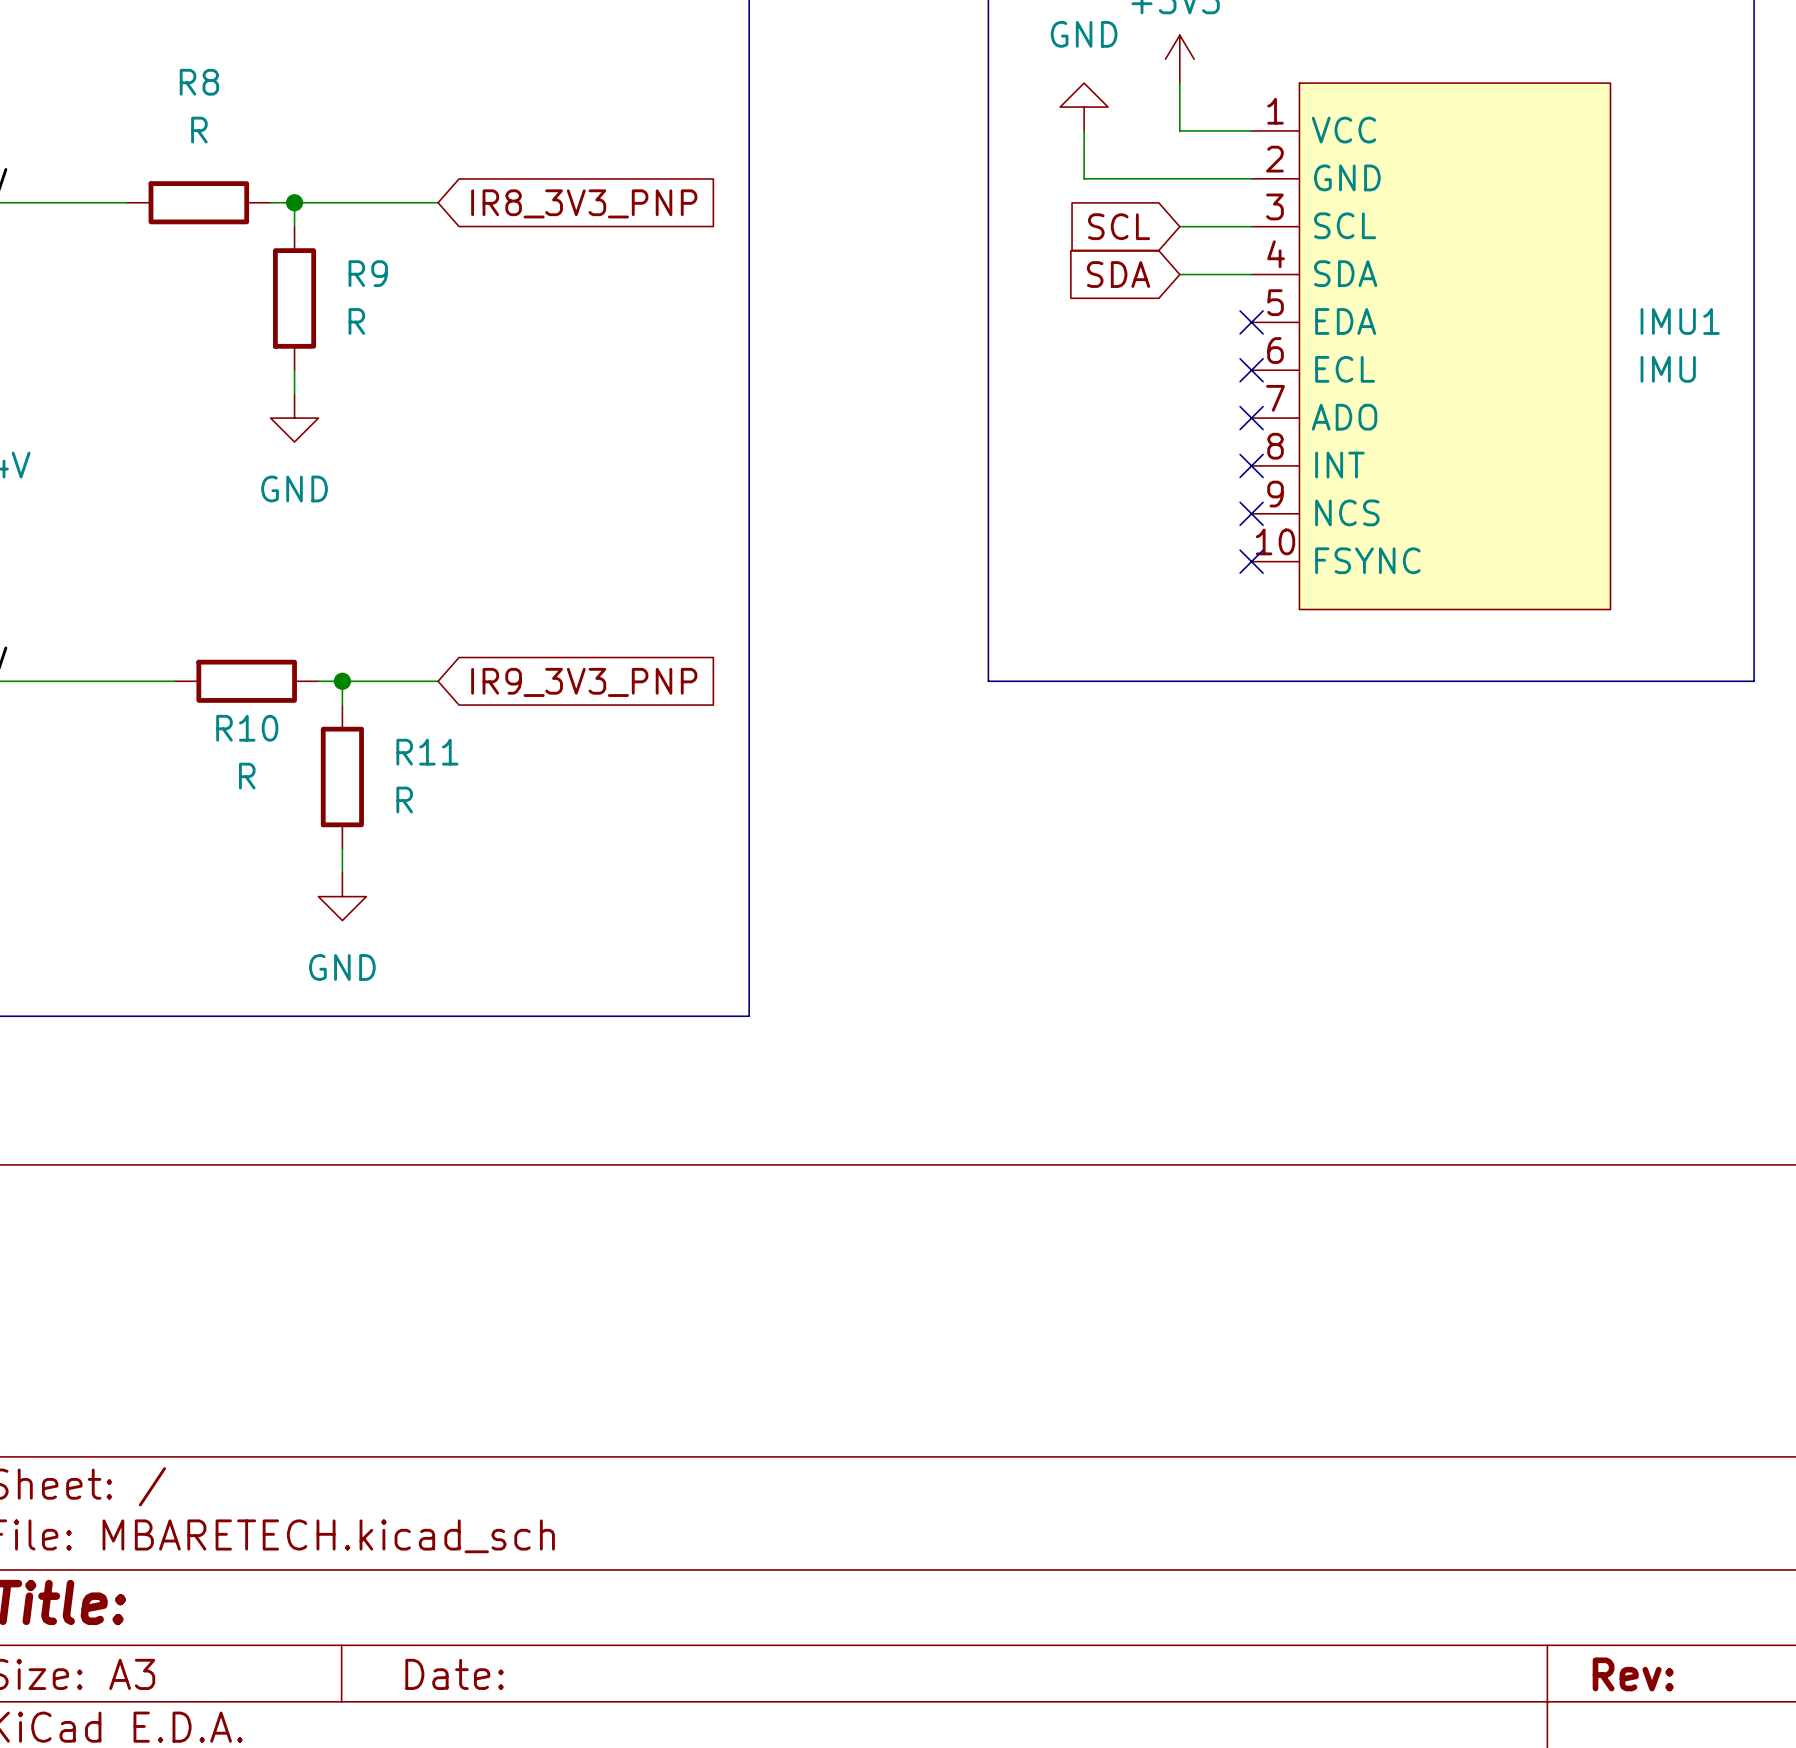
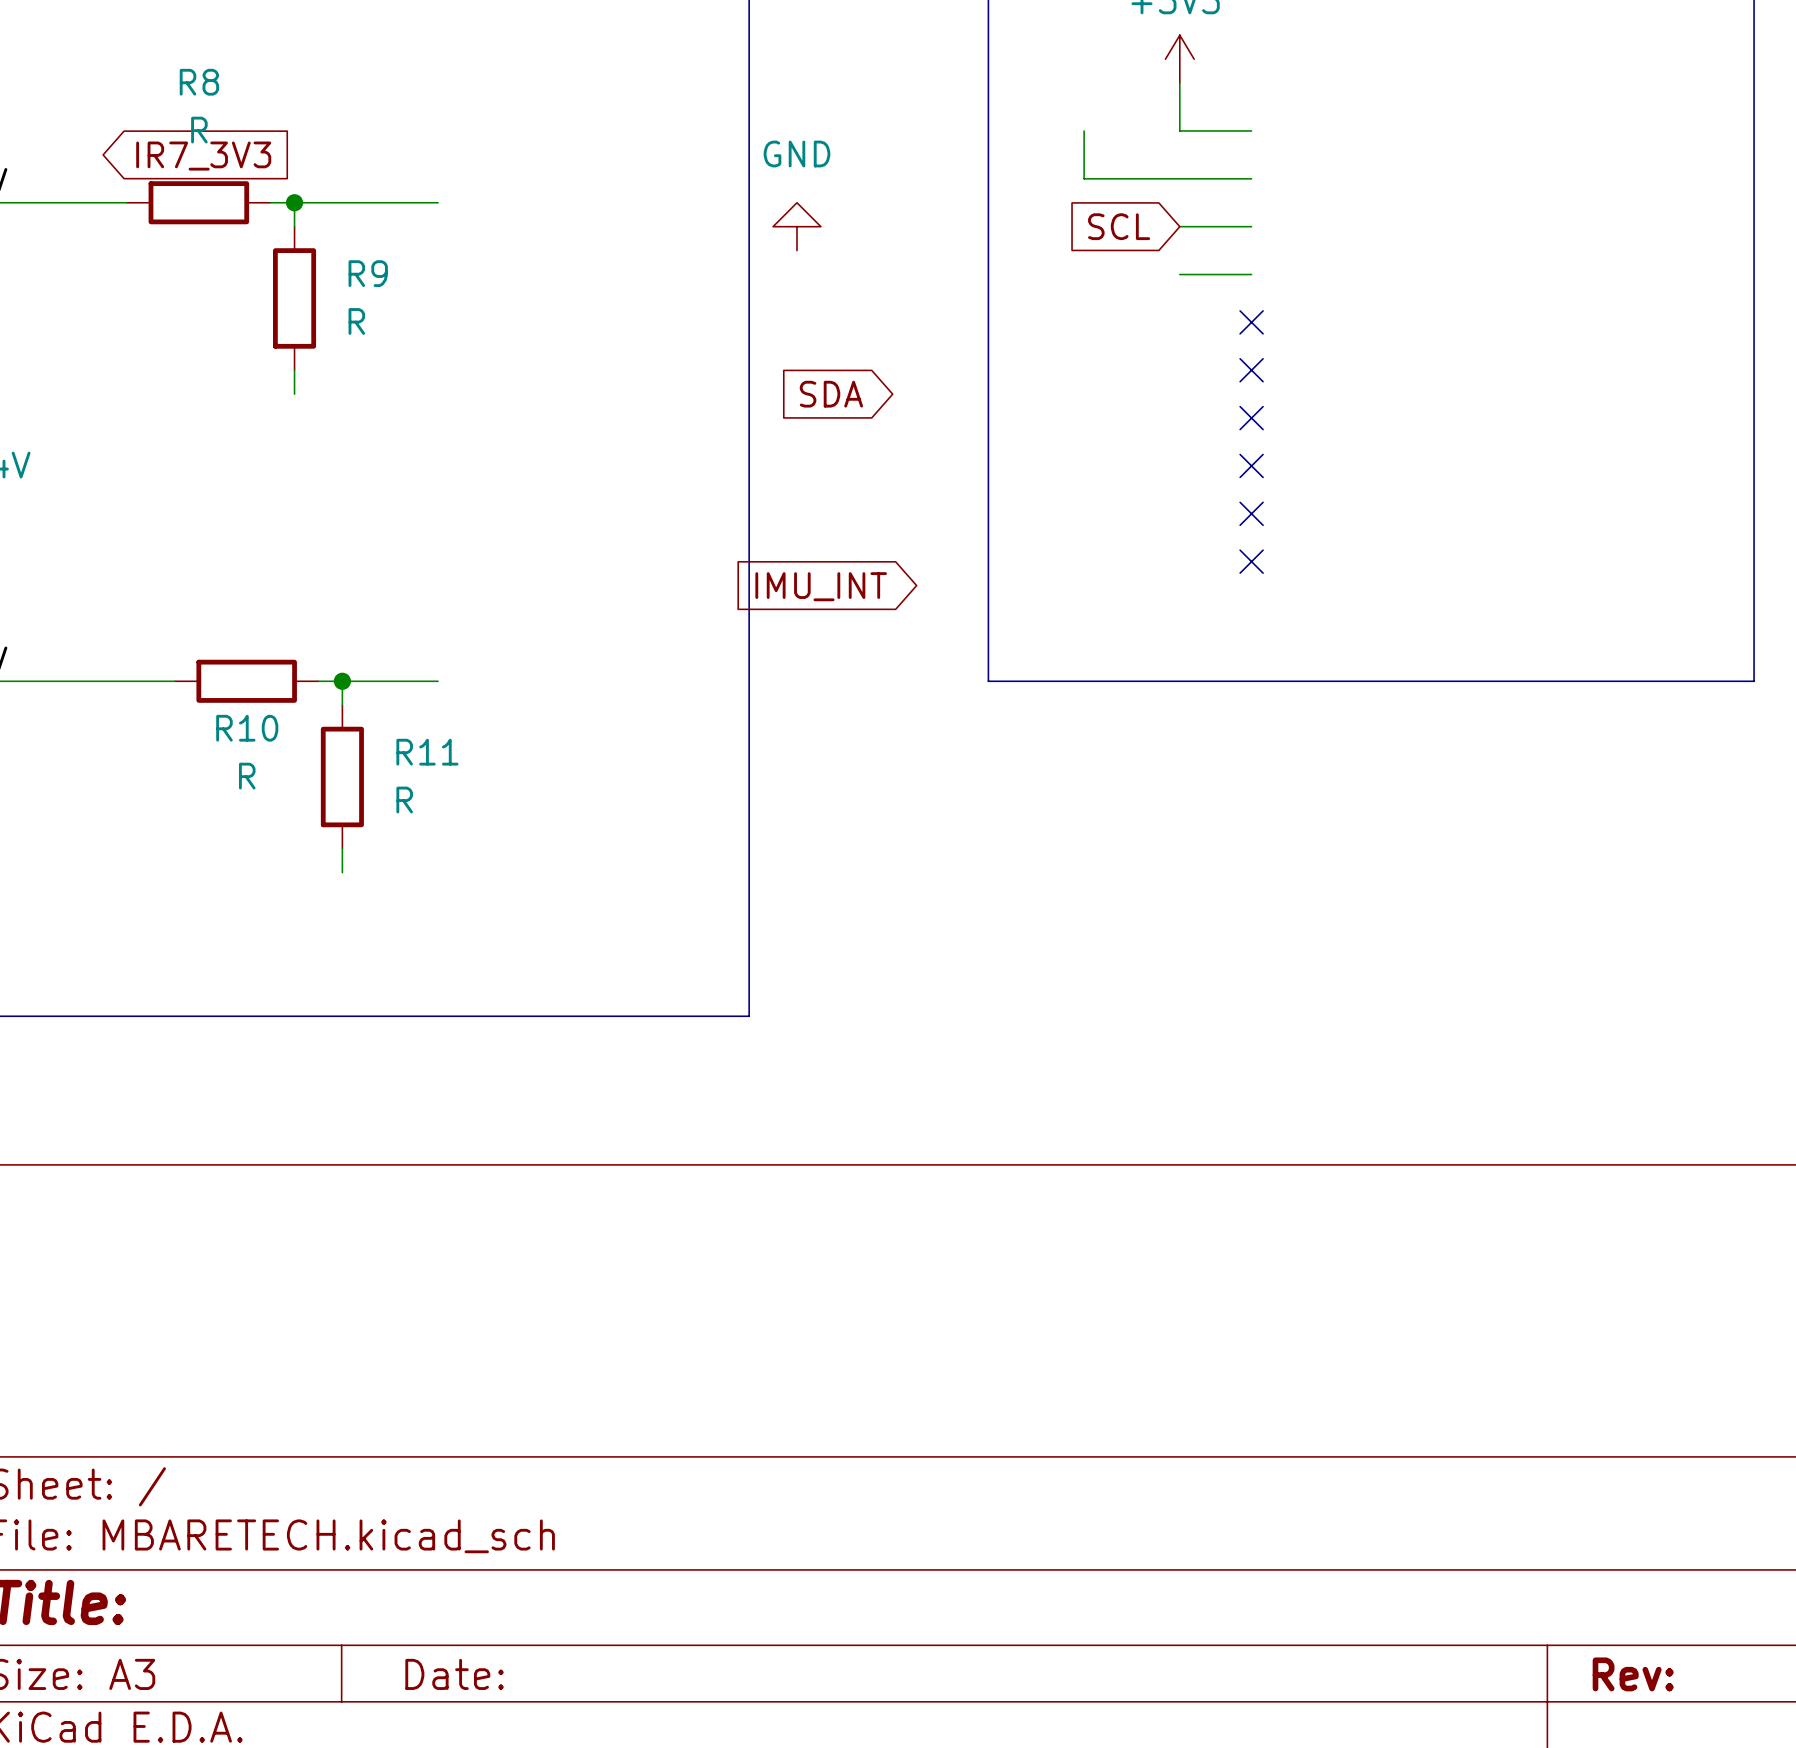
power symbol: GND (1084, 107) -> none
global label: none -> IR7_3V3 (203, 156)
global label: IR8_3V3_PNP (584, 203) -> none
power symbol: none -> GND (796, 226)
global label position: SDA (1118, 274) -> SDA (831, 394)
IMU1: IMU (1431, 346) -> none
power symbol: GND (294, 418) -> none
global label: none -> IMU_INT (821, 586)
global label: IR9_3V3_PNP (584, 682) -> none
power symbol: GND (342, 896) -> none

